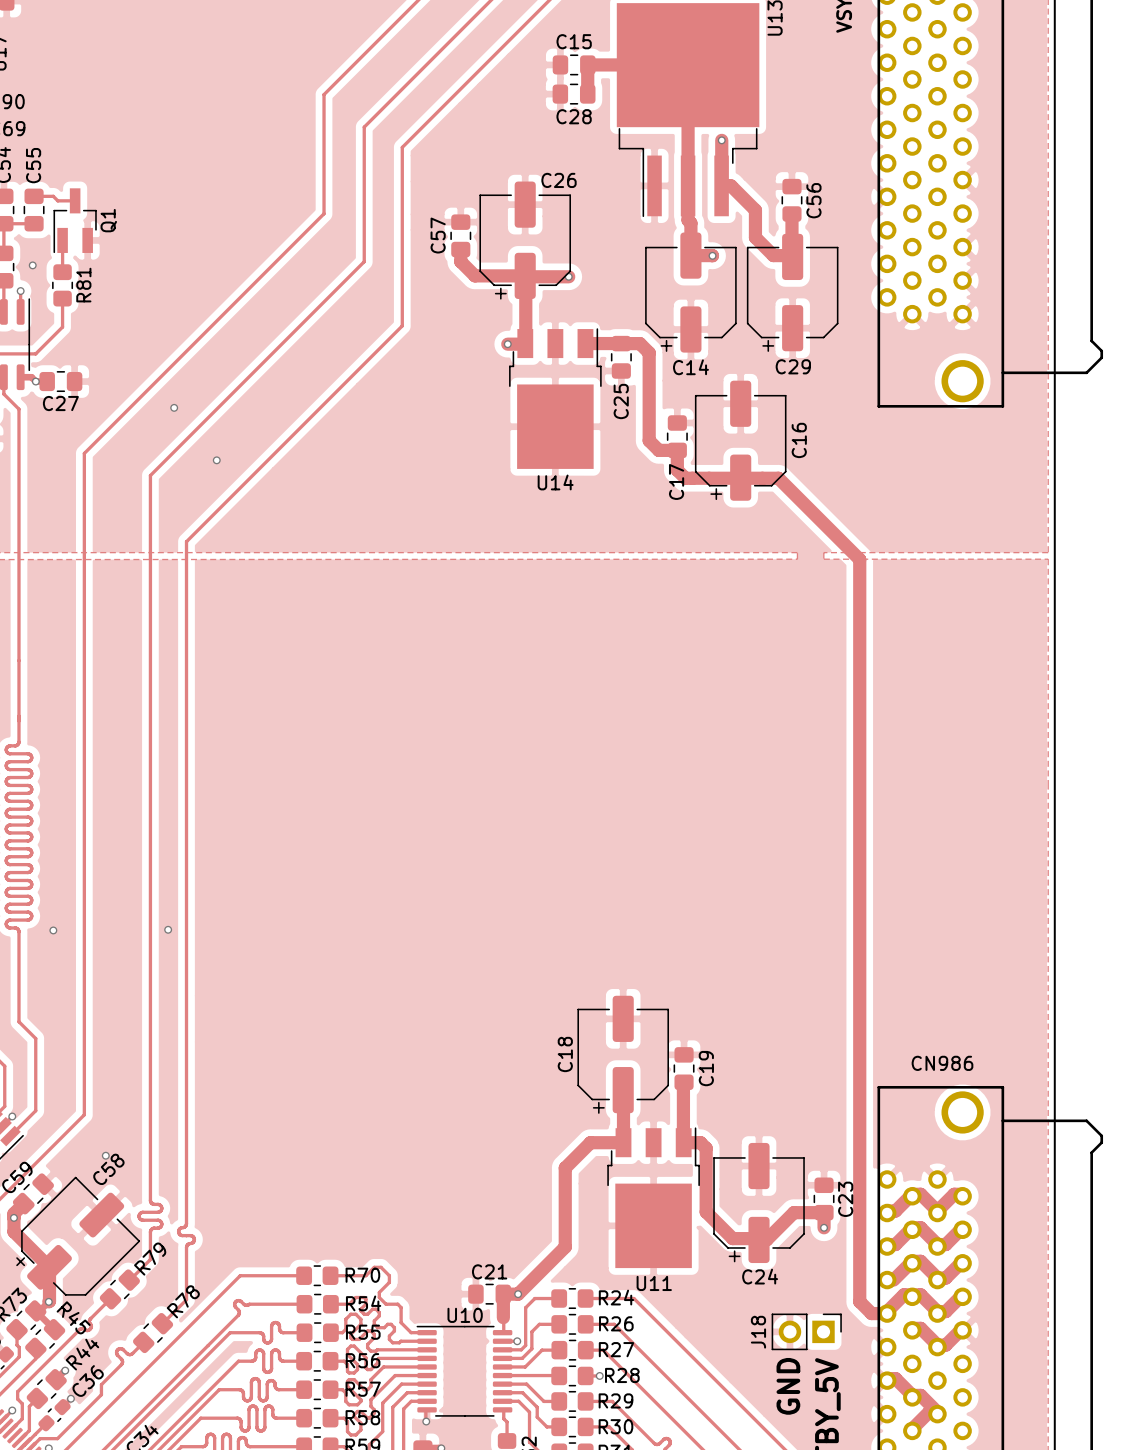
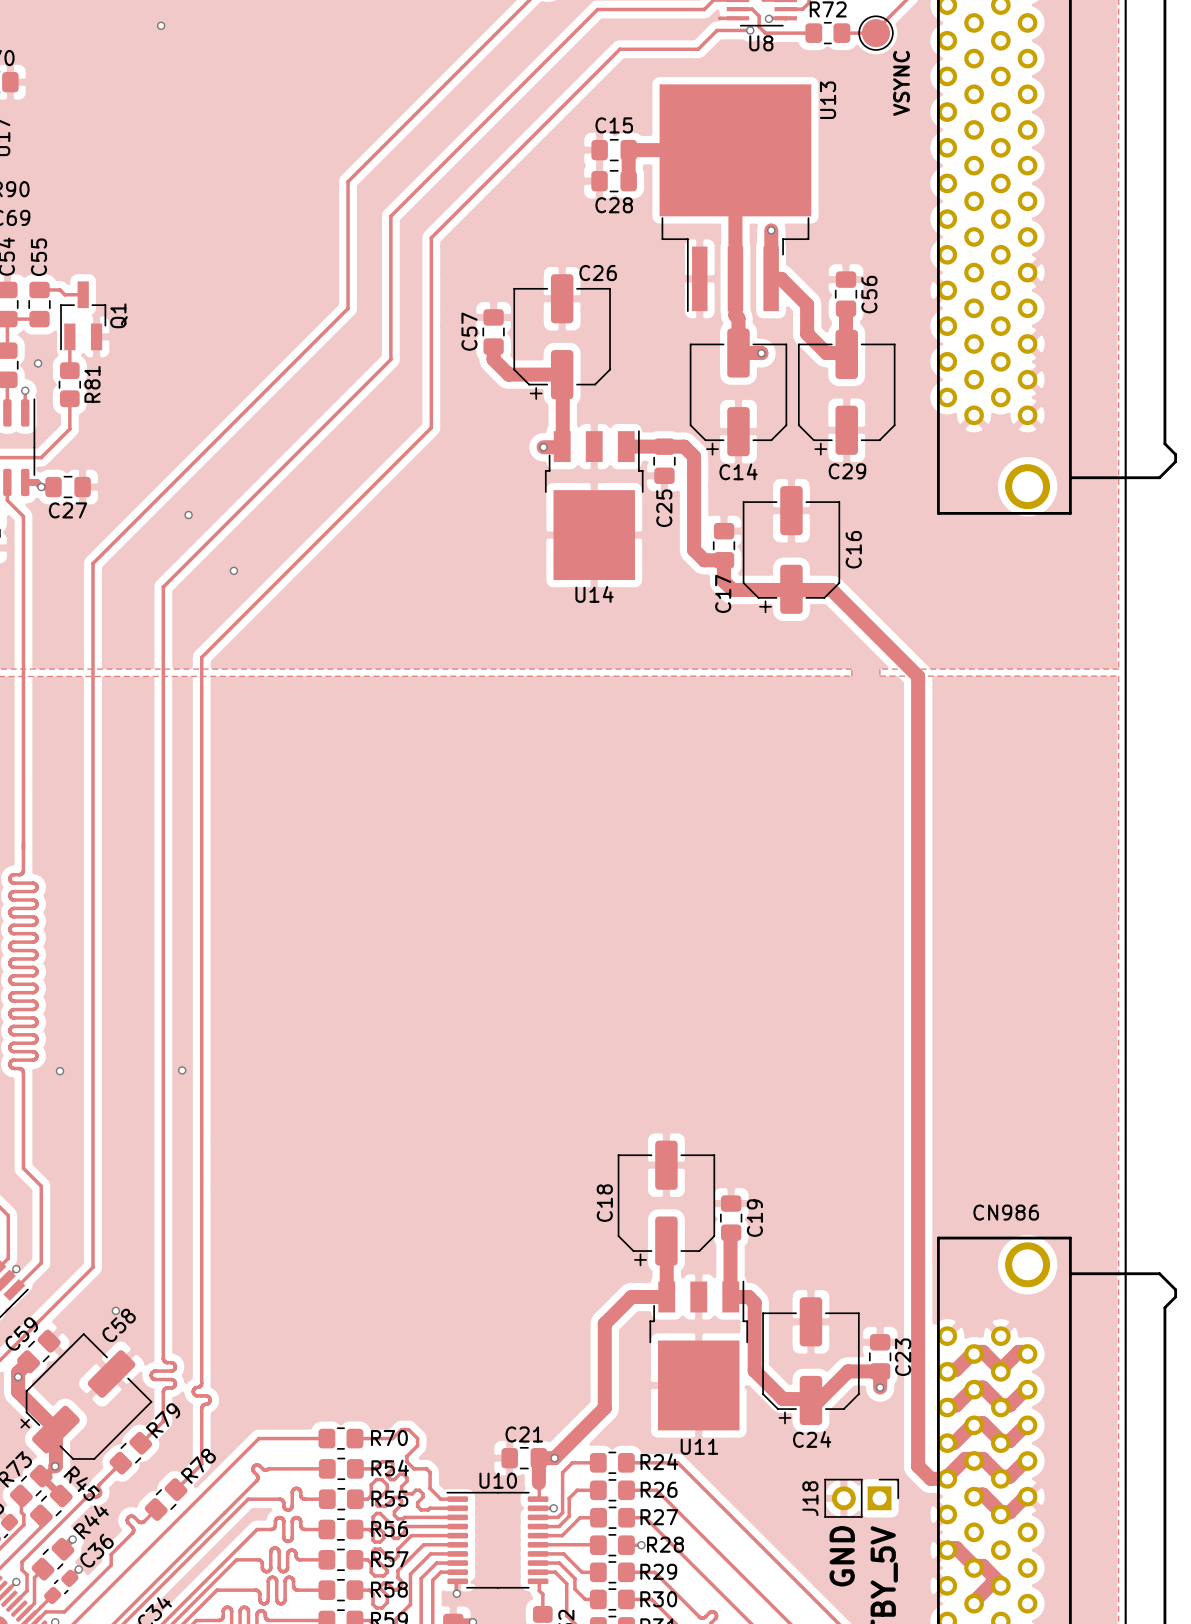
track: (525, 275) (568, 276) -> none
via: (568, 276) -> none

